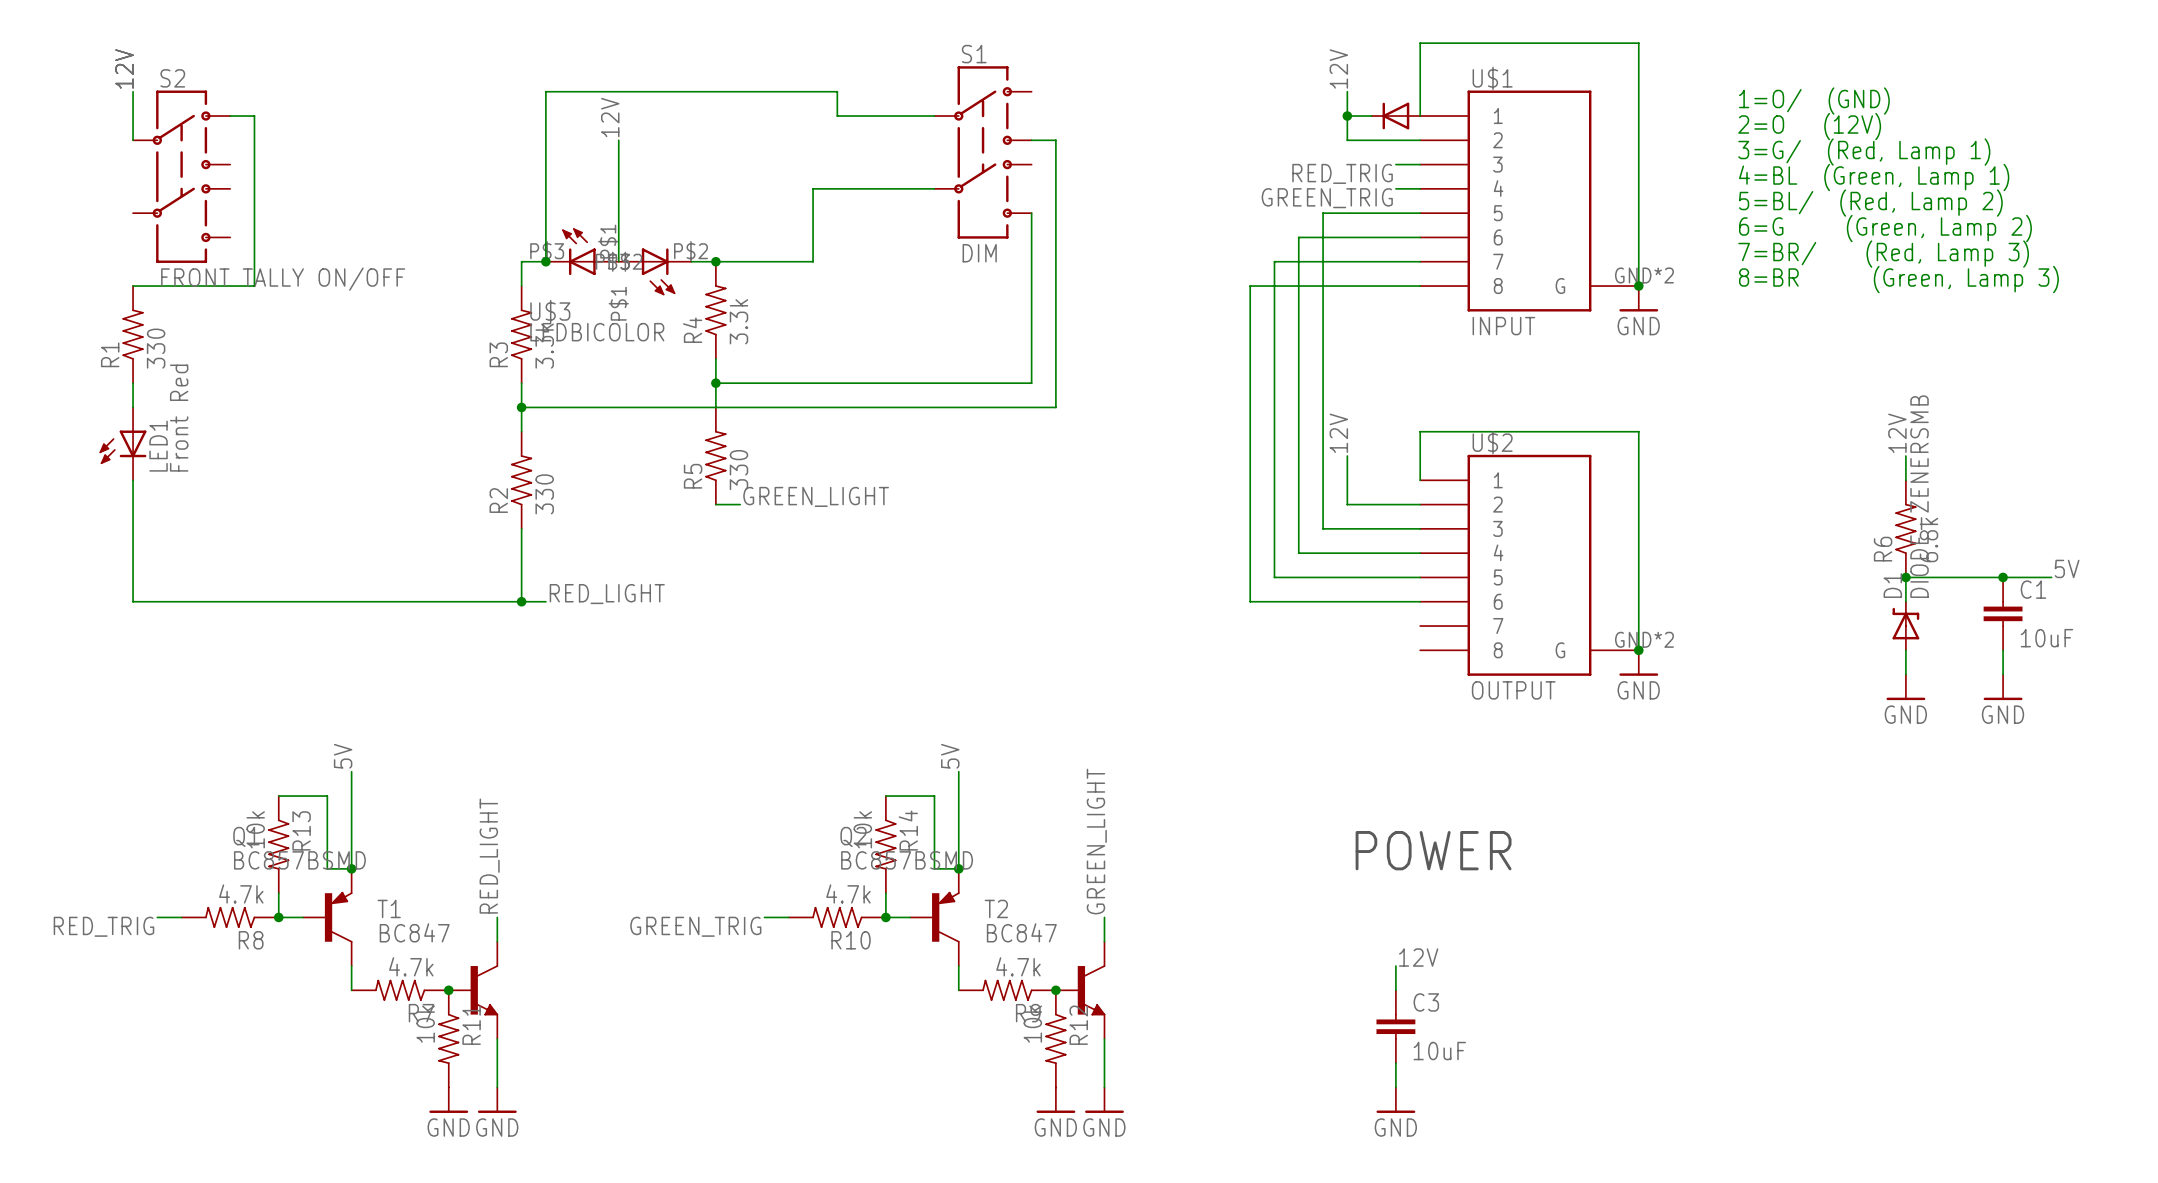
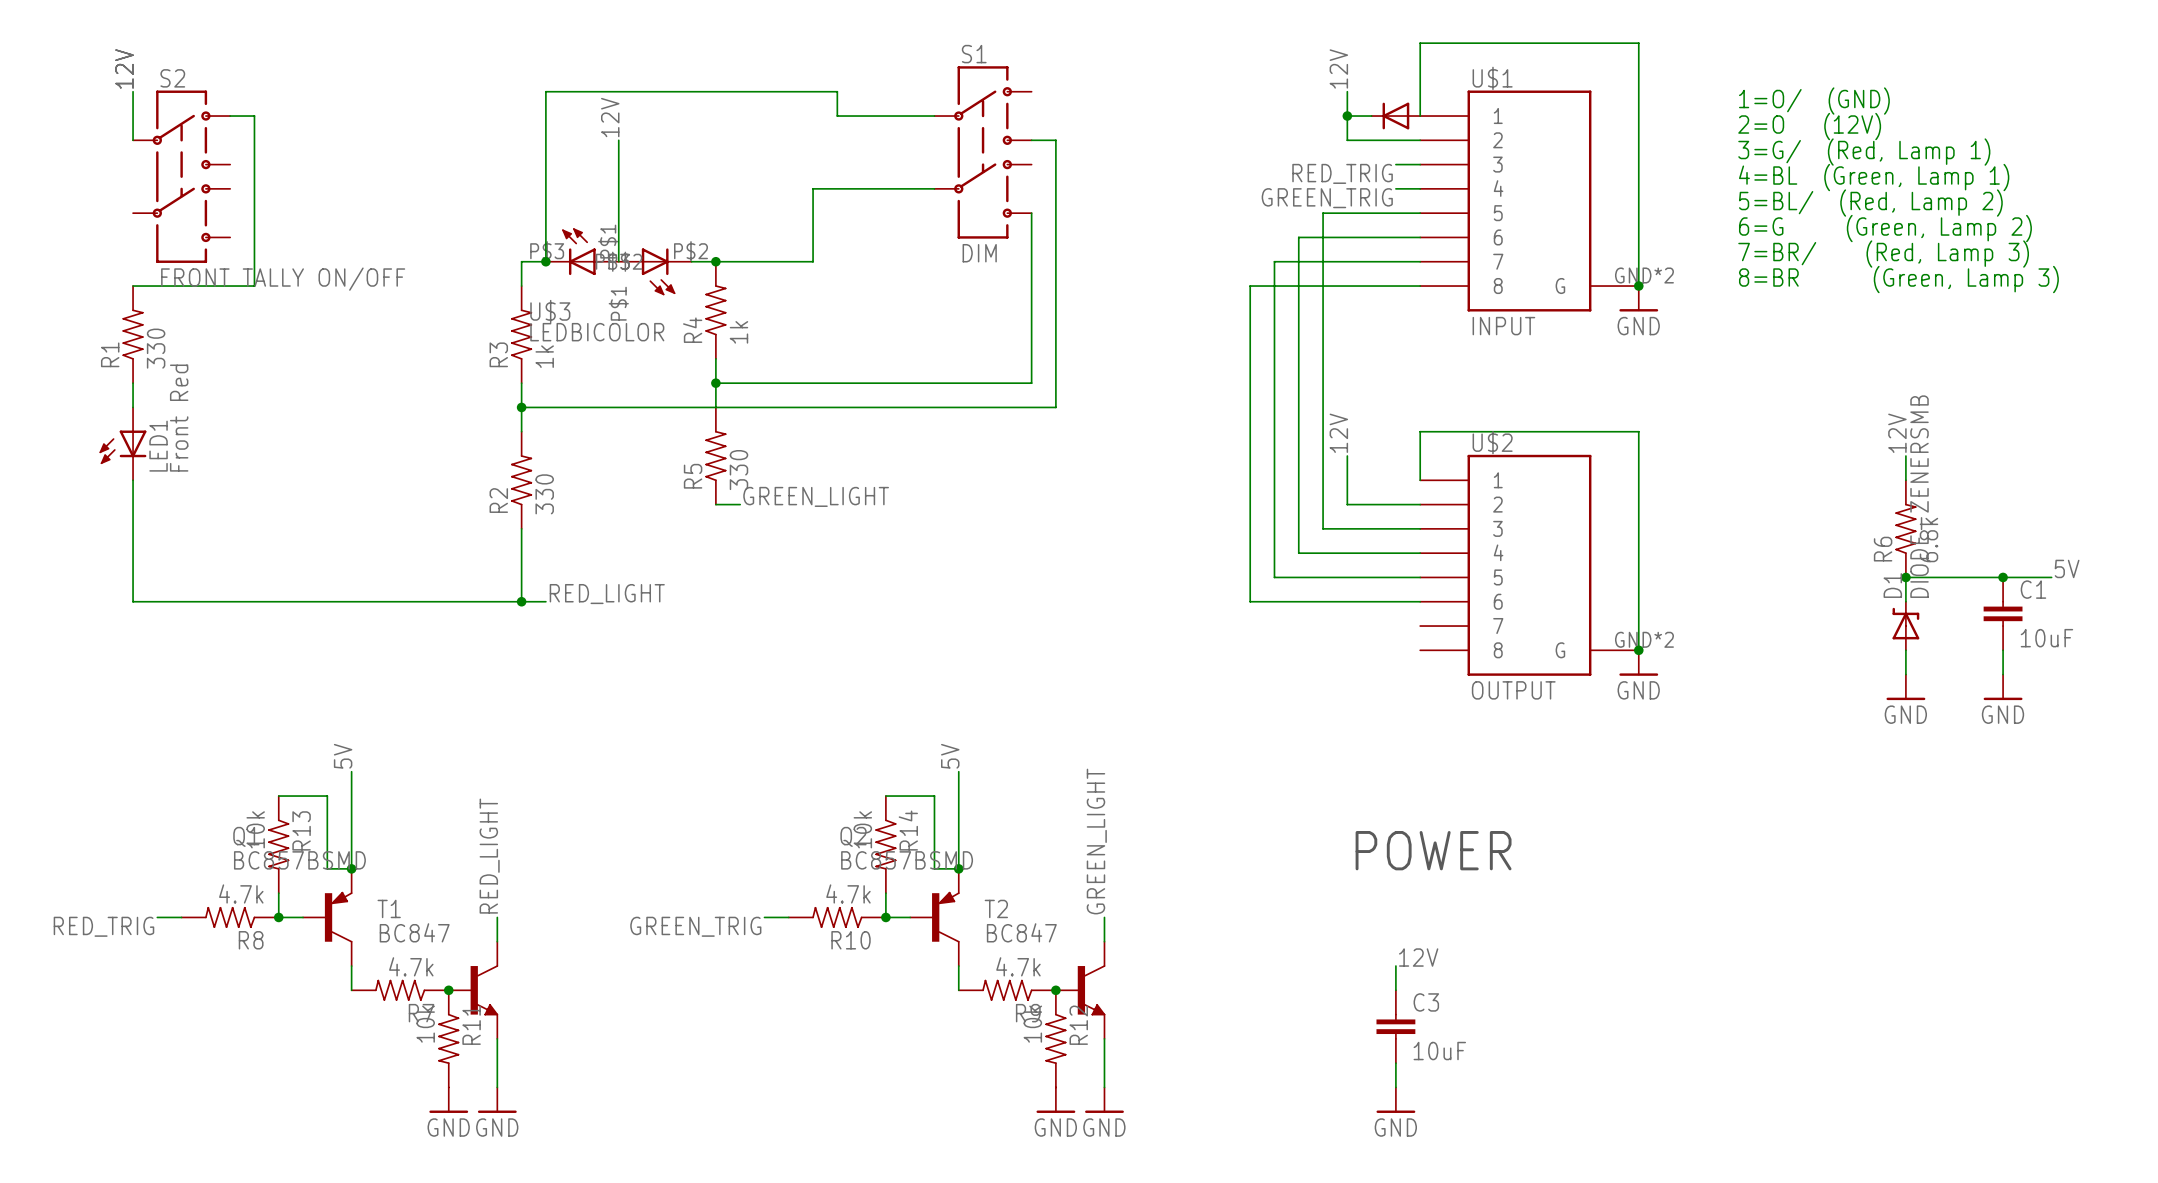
R4 value: 3.3k (738, 321) -> 1k (738, 332)
R3 value: 3.3k (544, 346) -> 1k (544, 356)

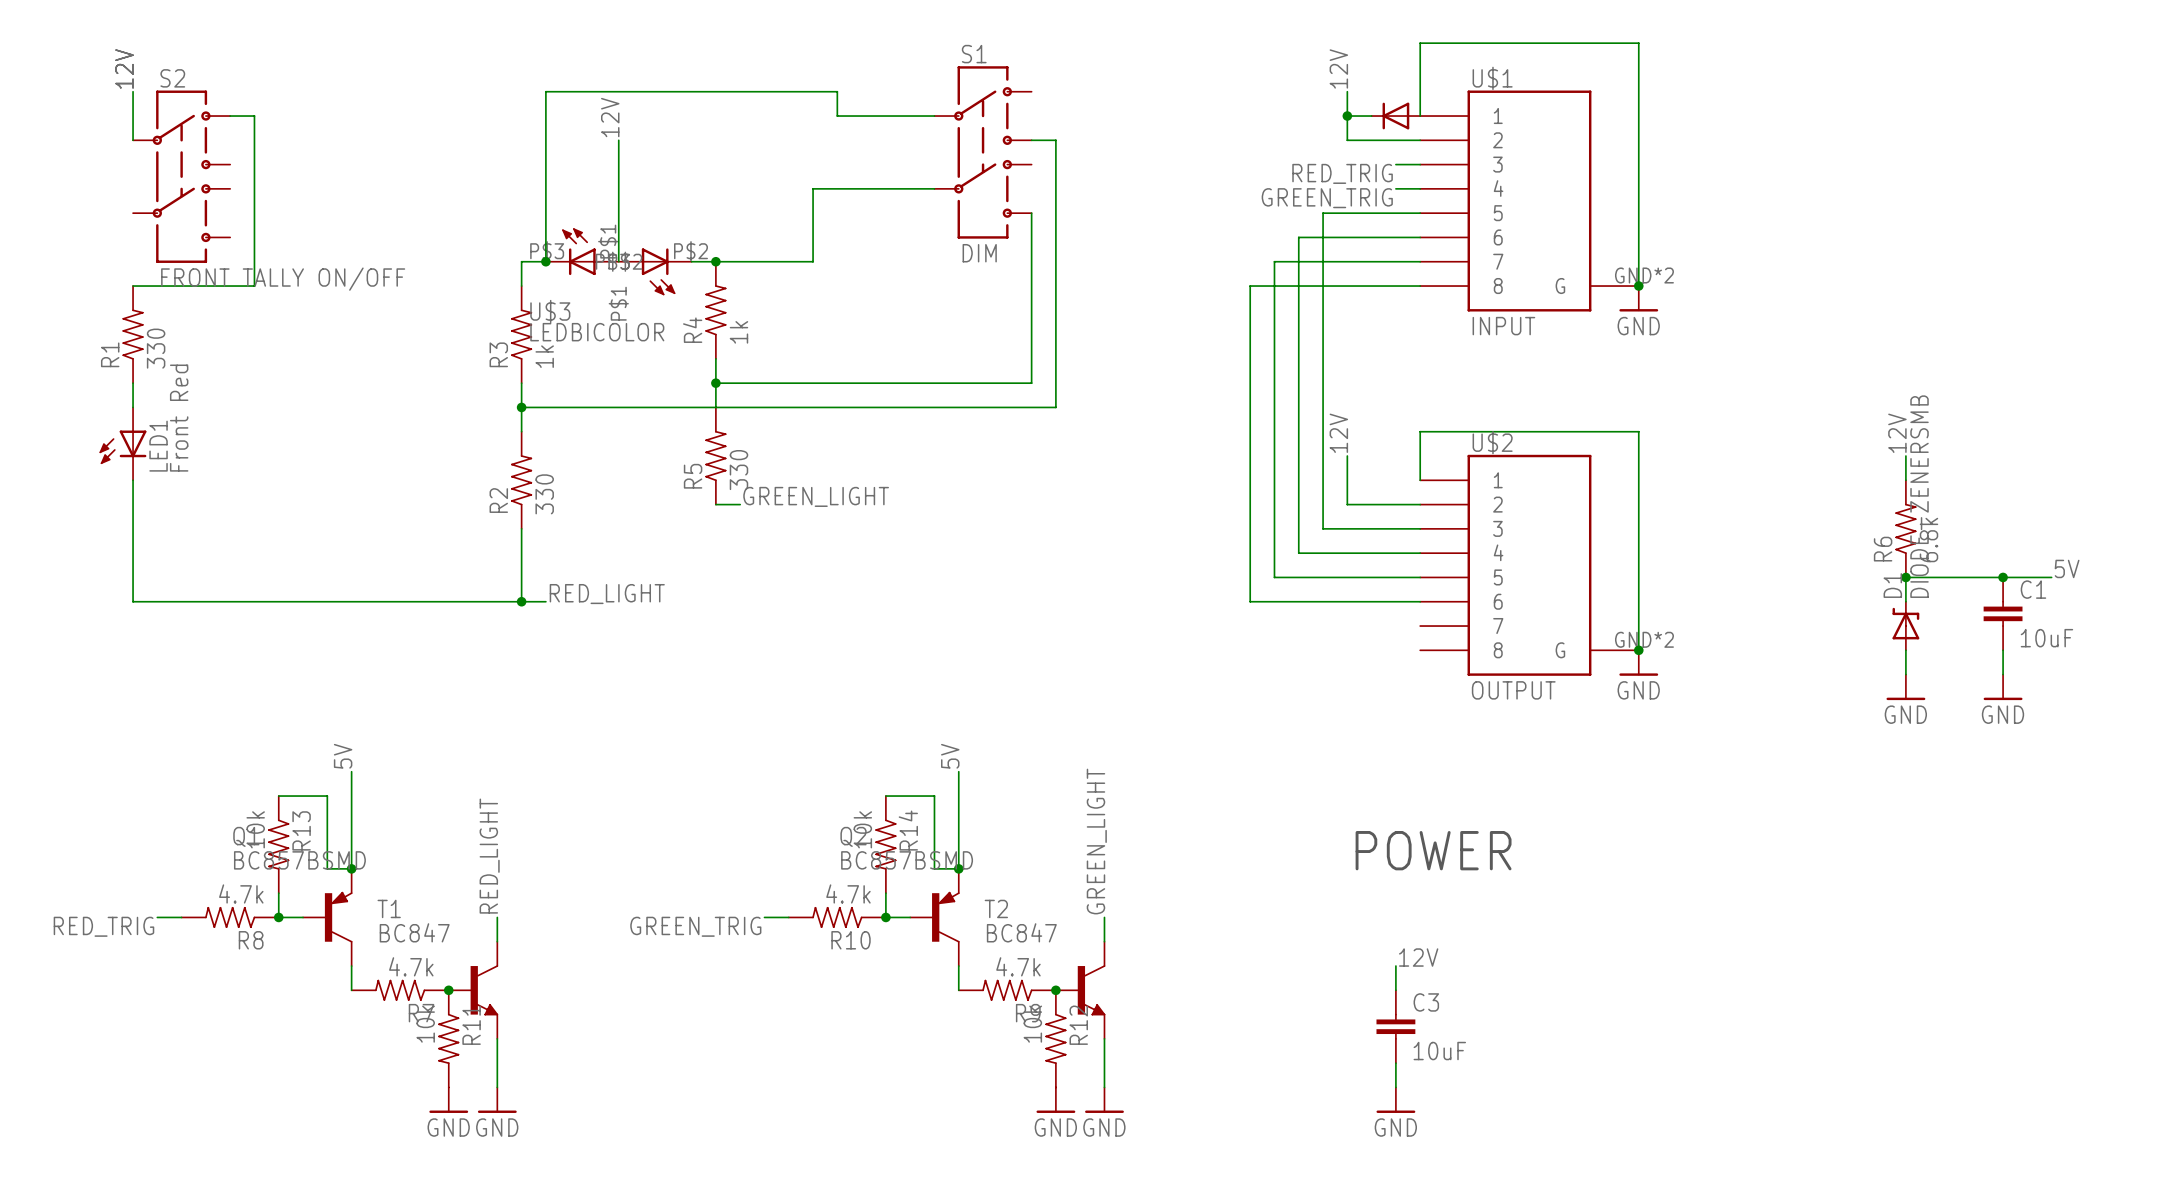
text: 1=O/ (GND) (1814, 101) -> none
text: 2=O (12V) (1809, 126) -> none
text: 3=G/ (Red, Lamp 1) (1864, 152) -> none
text: 4=BL (Green, Lamp 1) (1874, 177) -> none
text: 5=BL/ (Red, Lamp 2) (1870, 203) -> none
text: 6=G (Green, Lamp 2) (1885, 228) -> none
text: 7=BR/ (Red, Lamp 3) (1883, 254) -> none
text: 8=BR (Green, Lamp 3) (1898, 279) -> none

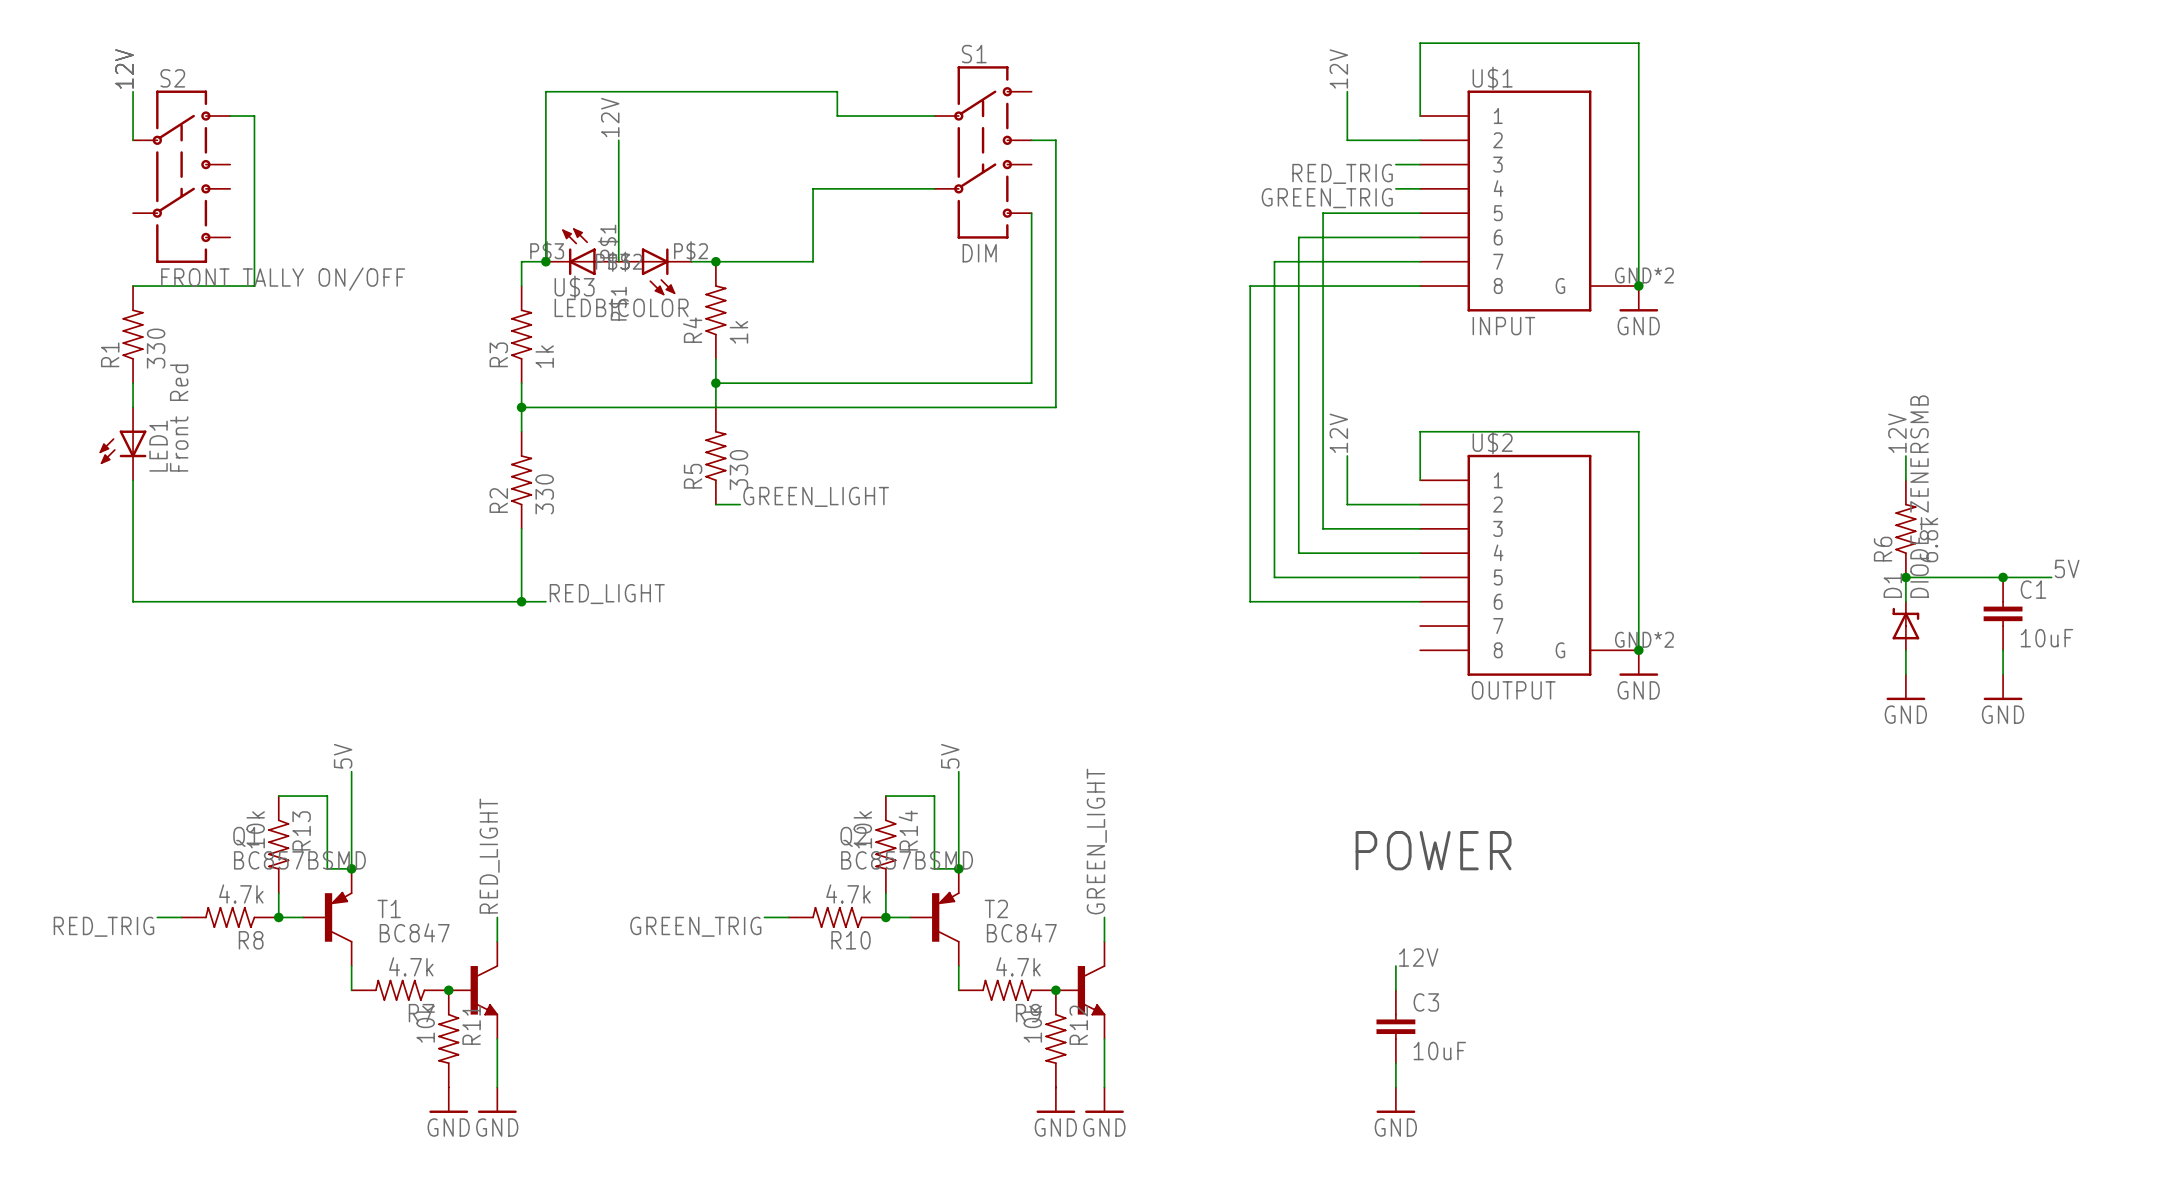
wire: (1347, 116) (1371, 116) -> none
junction: (1347, 116) -> none
part: (1395, 116) -> none
U$3 name position: U$3 (550, 311) -> U$3 (574, 287)
U$3 value position: LEDBICOLOR (597, 332) -> LEDBICOLOR (621, 307)

